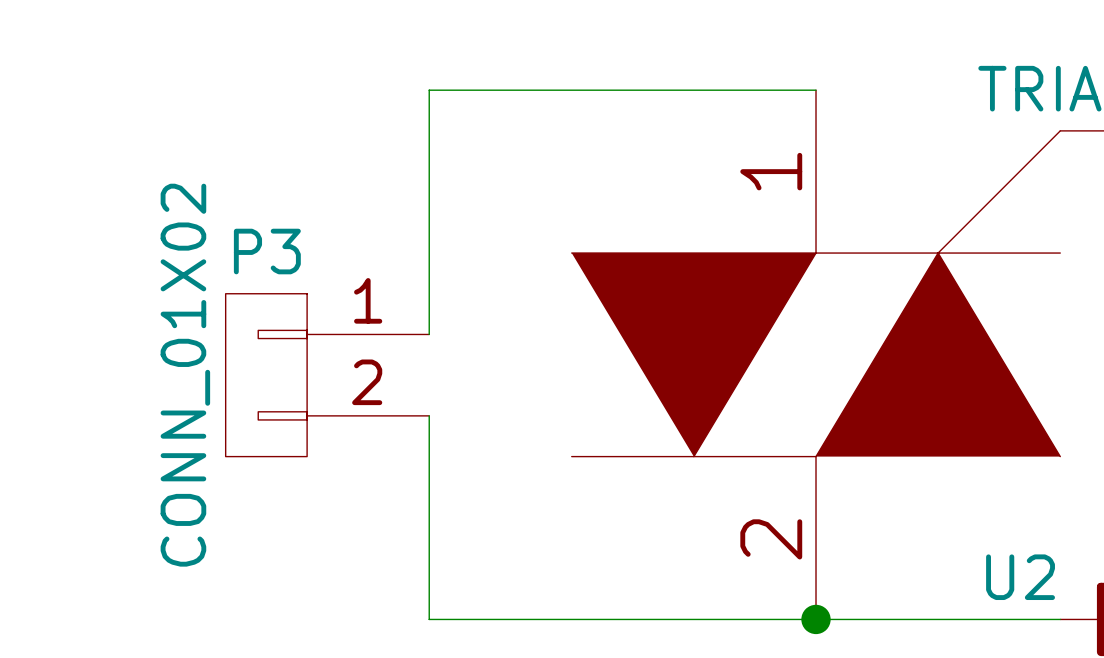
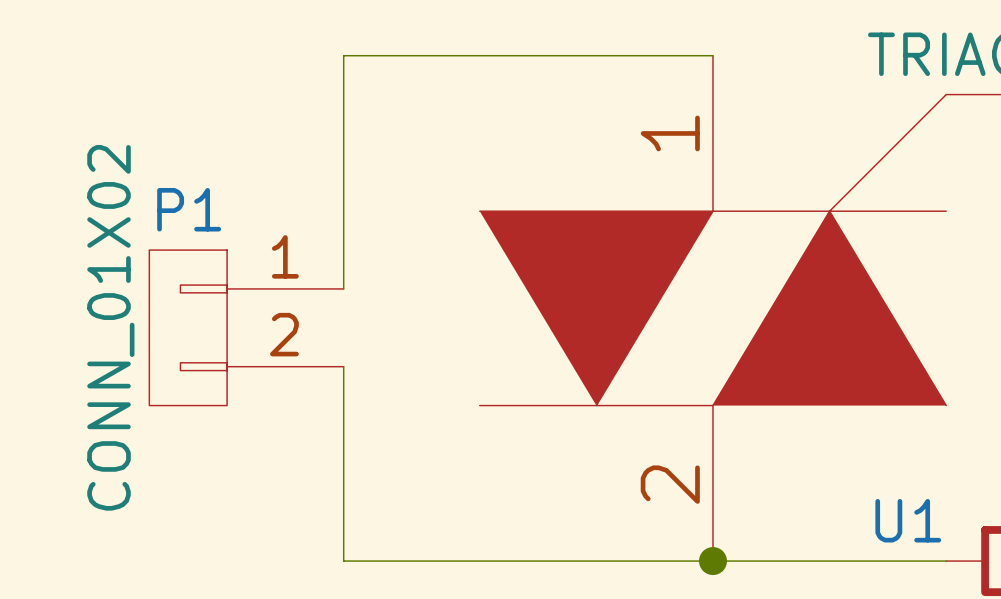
P3 name: P3 (267, 251) -> P1 (189, 209)
U2 name: U2 (1020, 577) -> U1 (908, 520)

